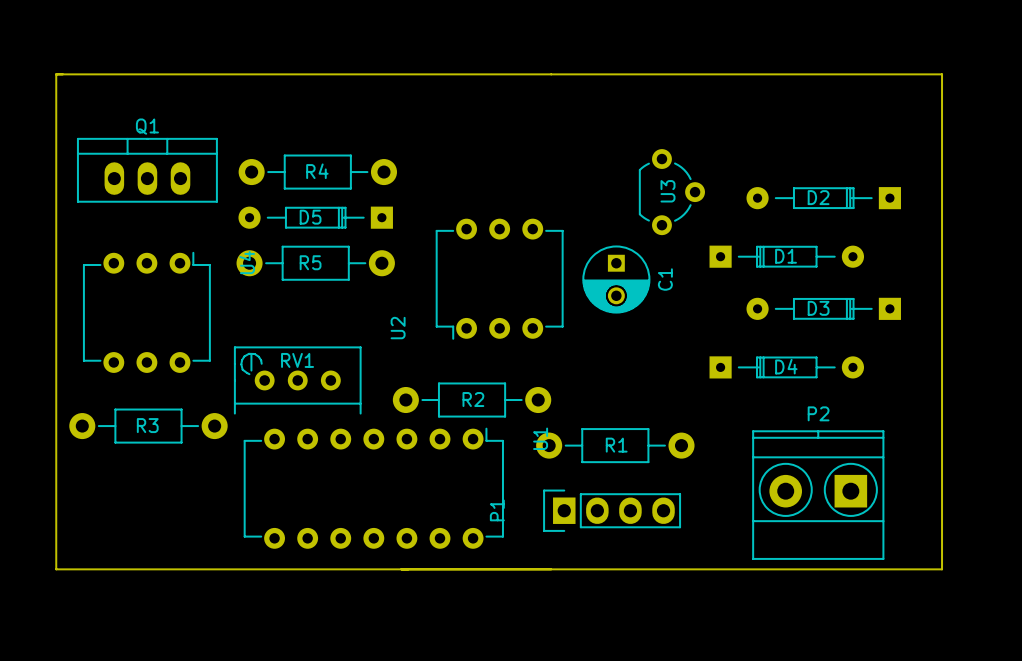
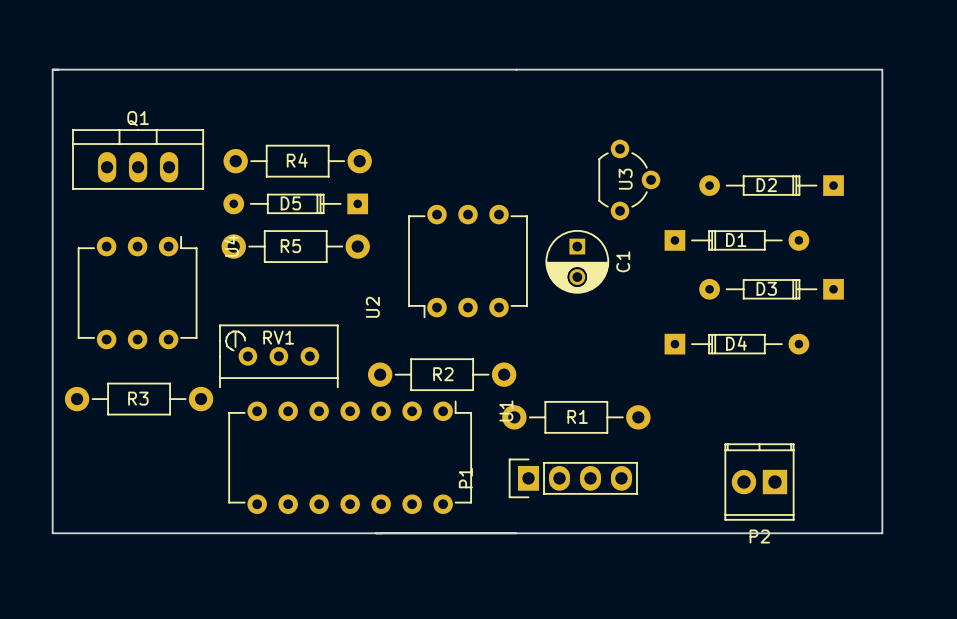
P2 name position: P2 (818, 413) -> P2 (759, 536)
P2 footprint: [752, 430, 885, 560] -> [724, 443, 795, 521]

